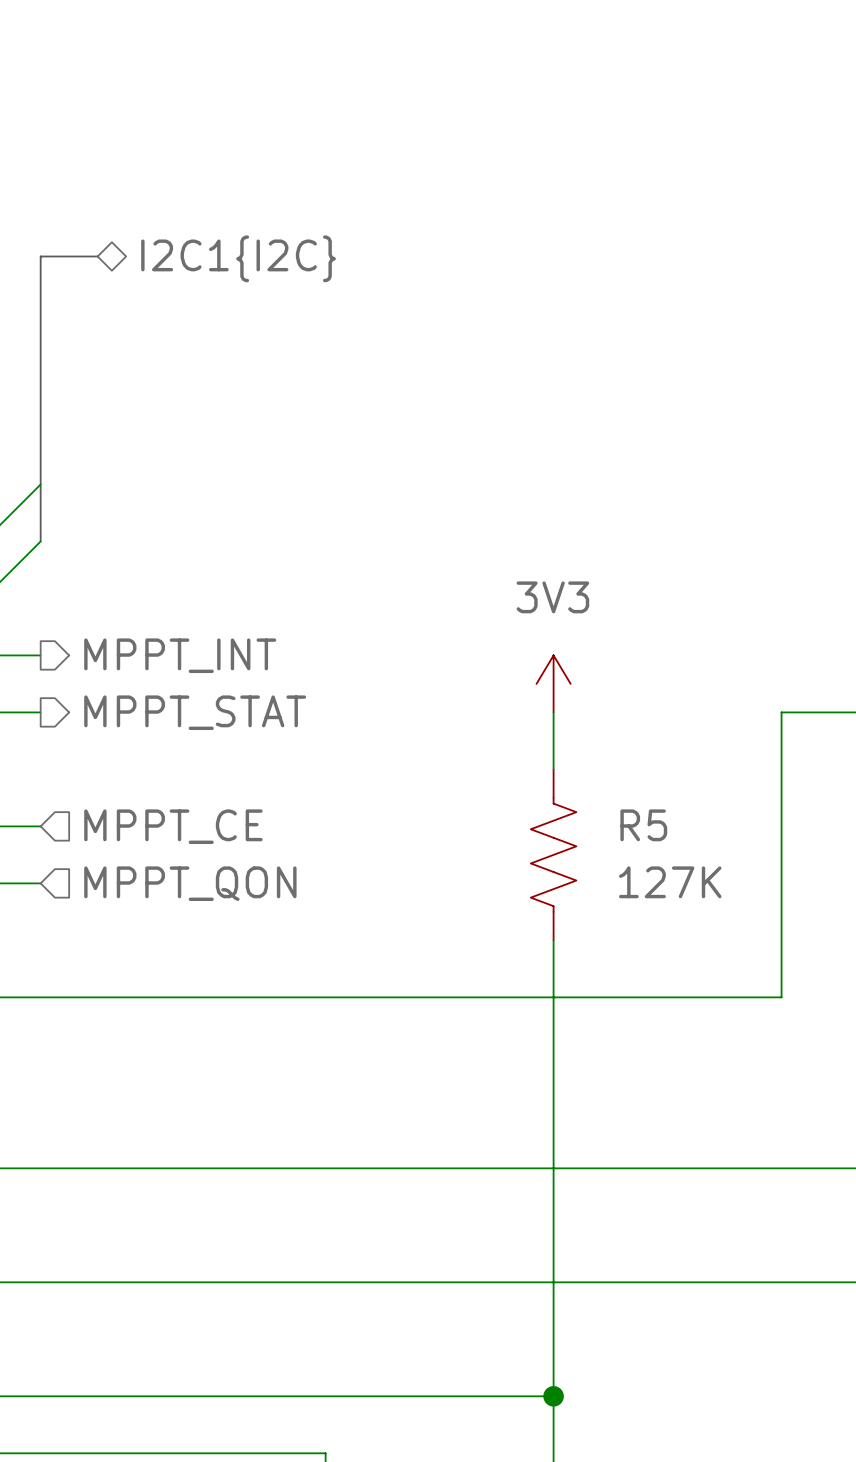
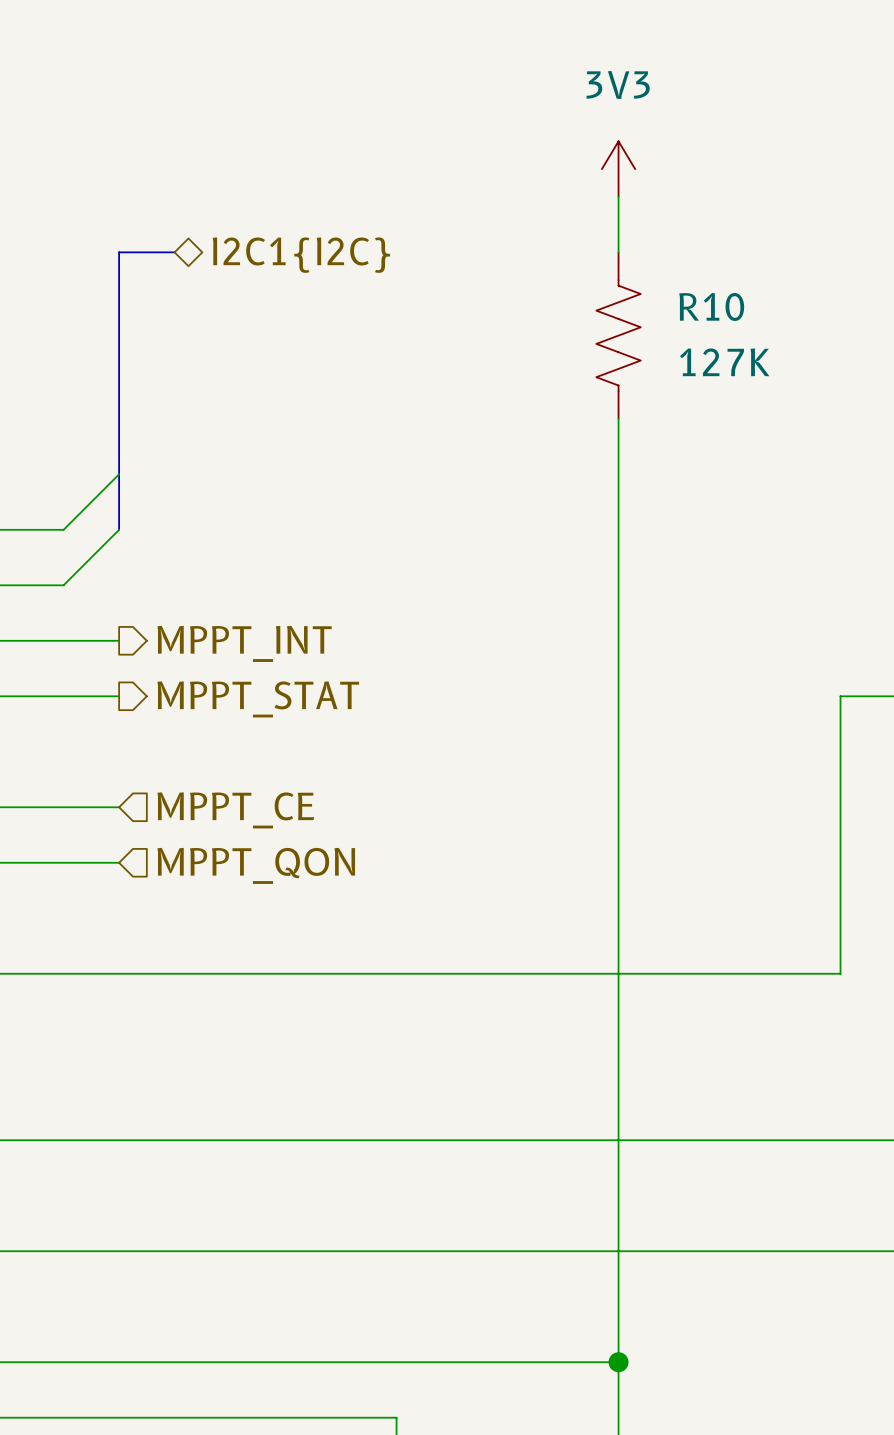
wire: none -> (618, 196) (618, 252)
R10: none -> 127K (618, 335)
wire: none -> (618, 418) (618, 696)
power symbol position: 3V3 (553, 683) -> 3V3 (618, 169)
wire: none -> (618, 751) (618, 918)
R5: 127K (553, 854) -> none

